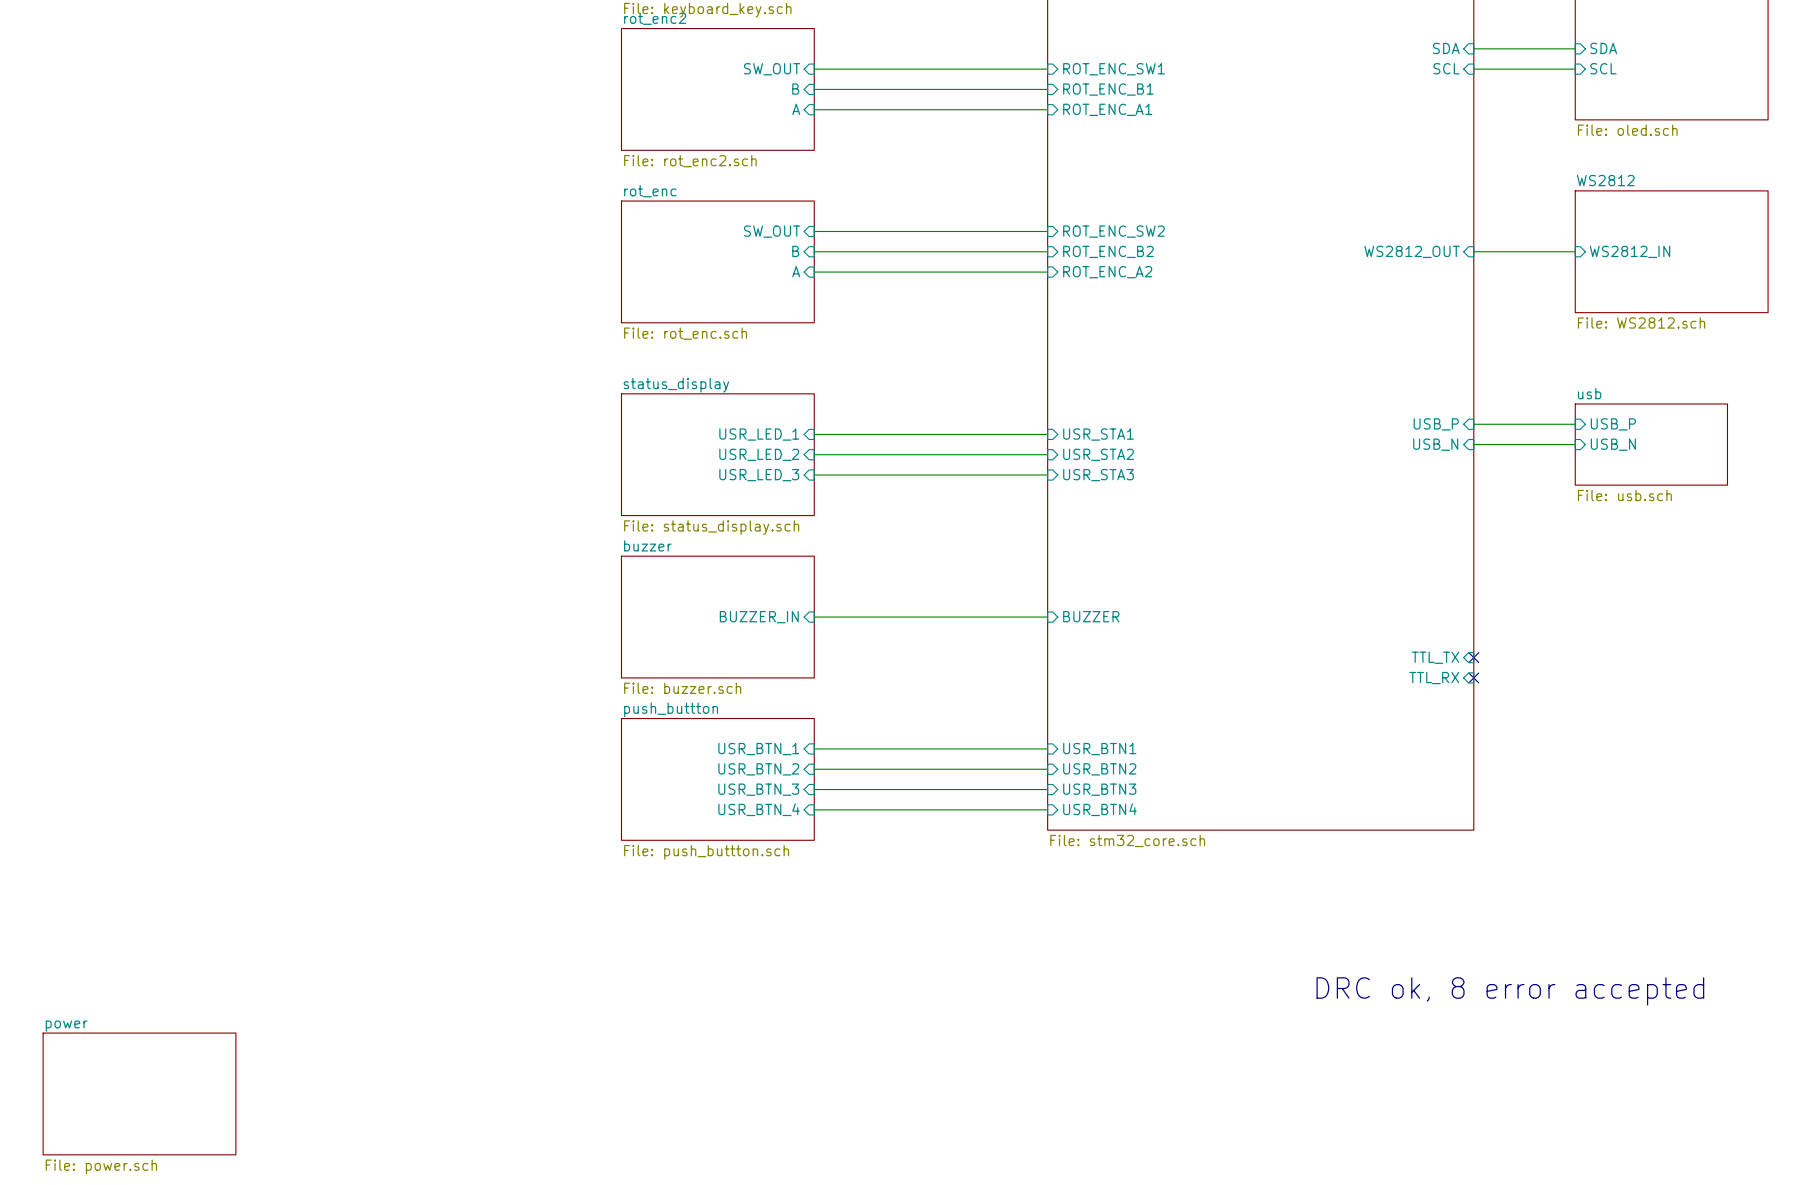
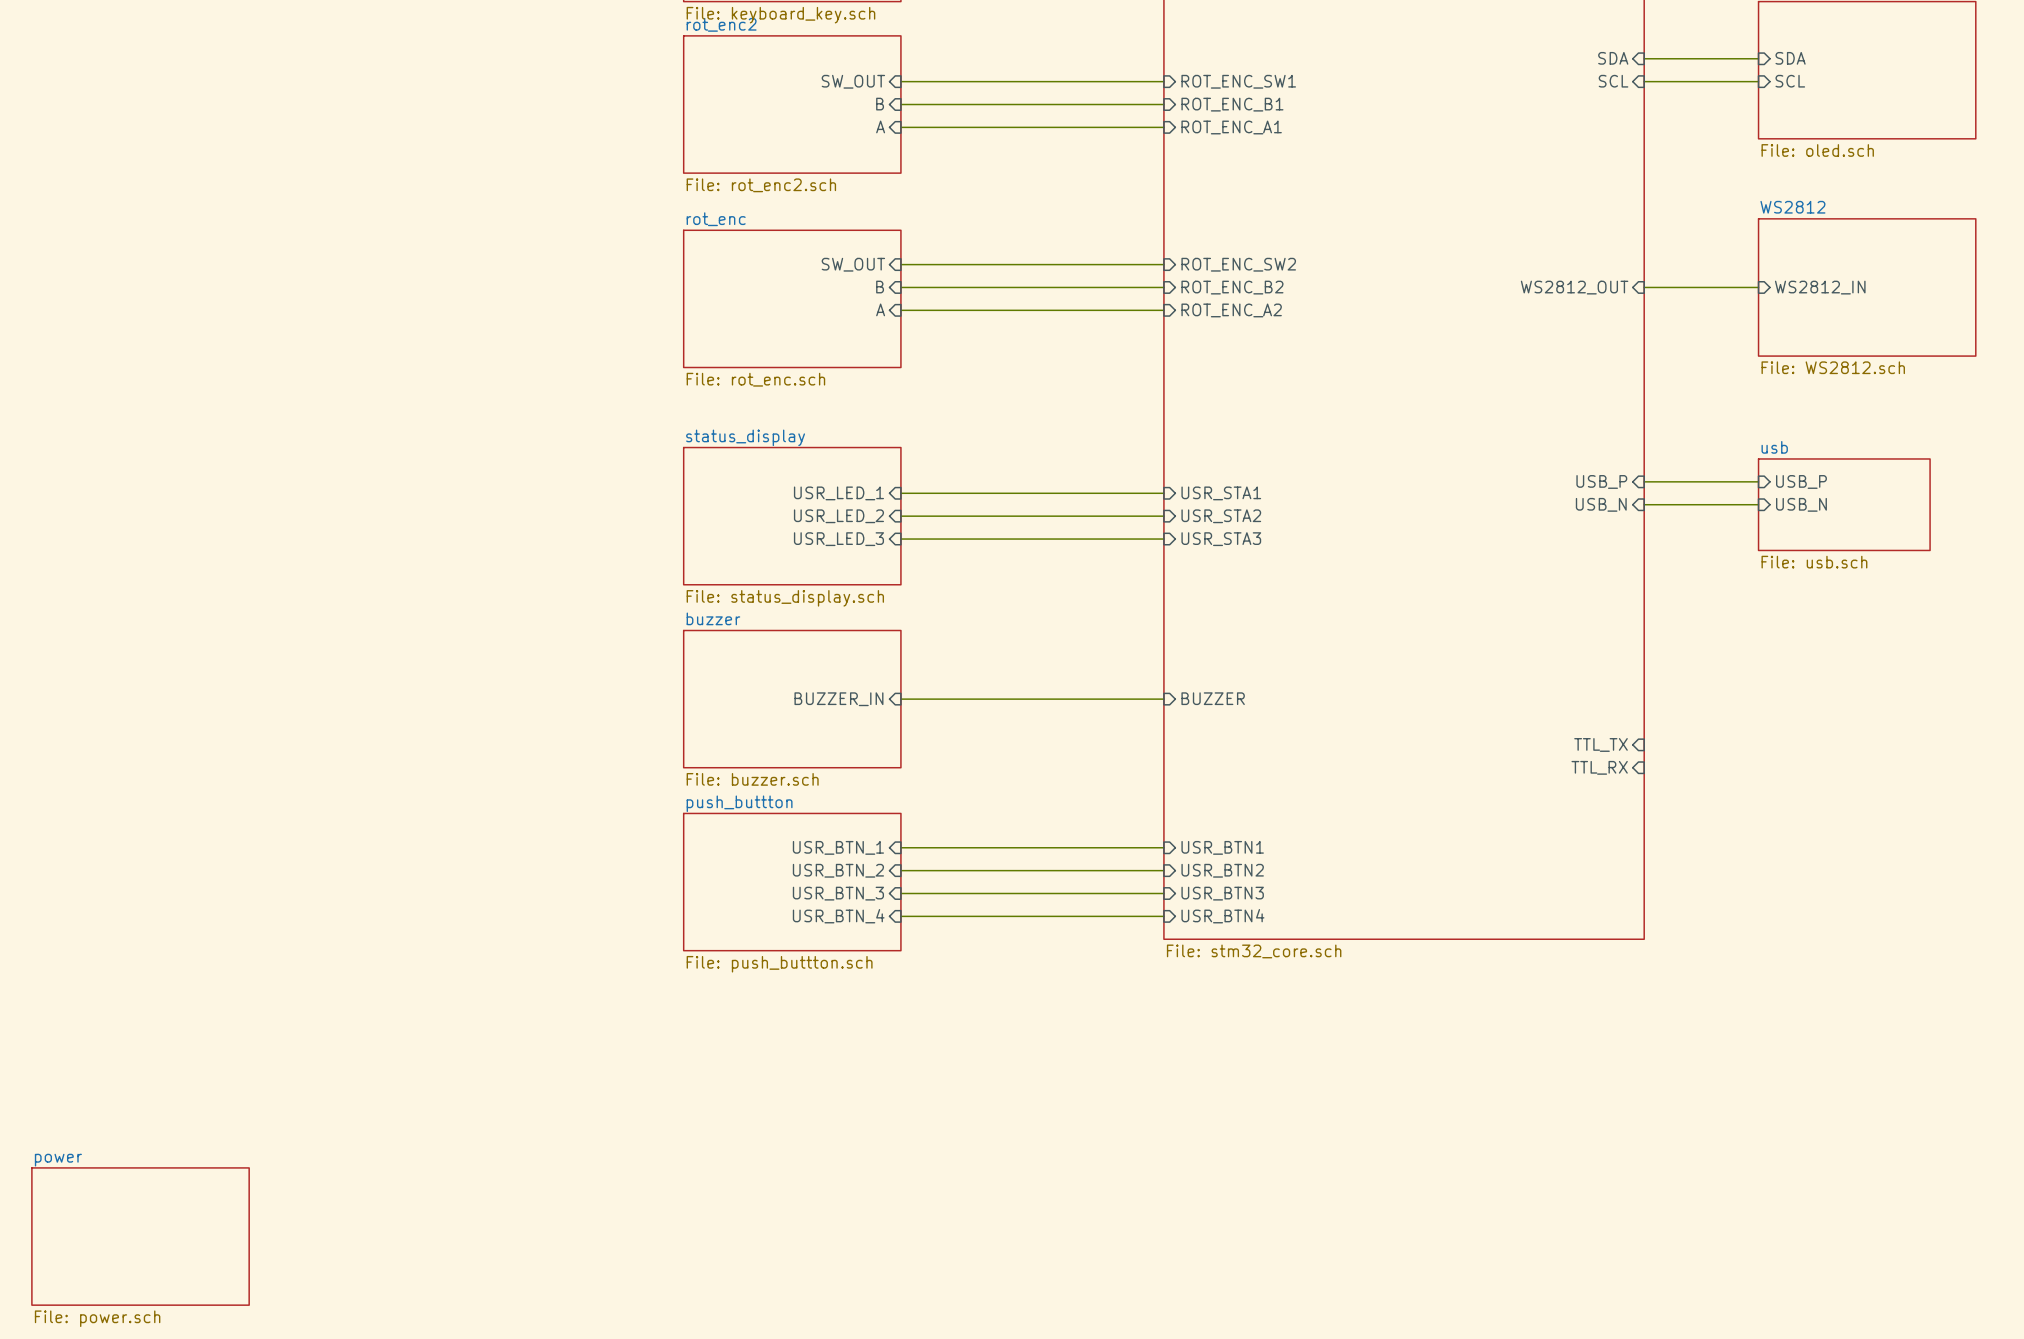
no-connect mark: (1473, 657) -> none
no-connect mark: (1473, 677) -> none
text: DRC ok, 8 error accepted (1510, 991) -> none

